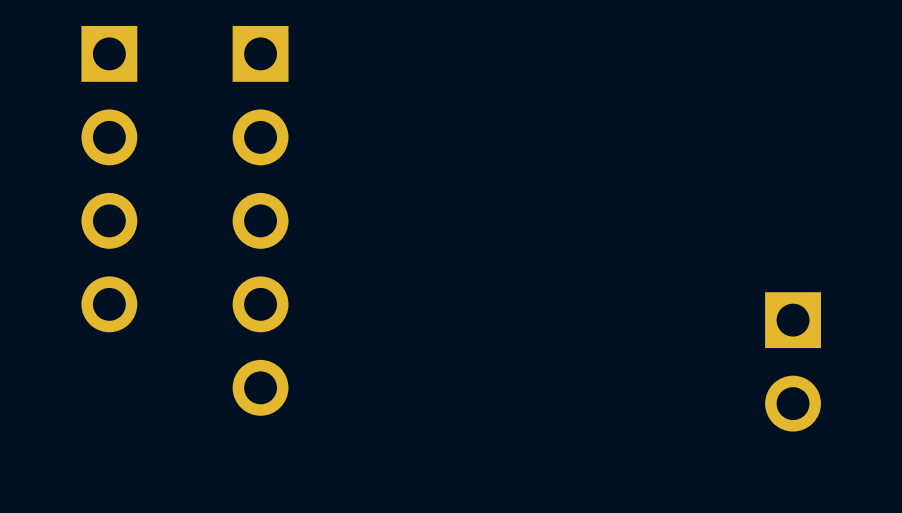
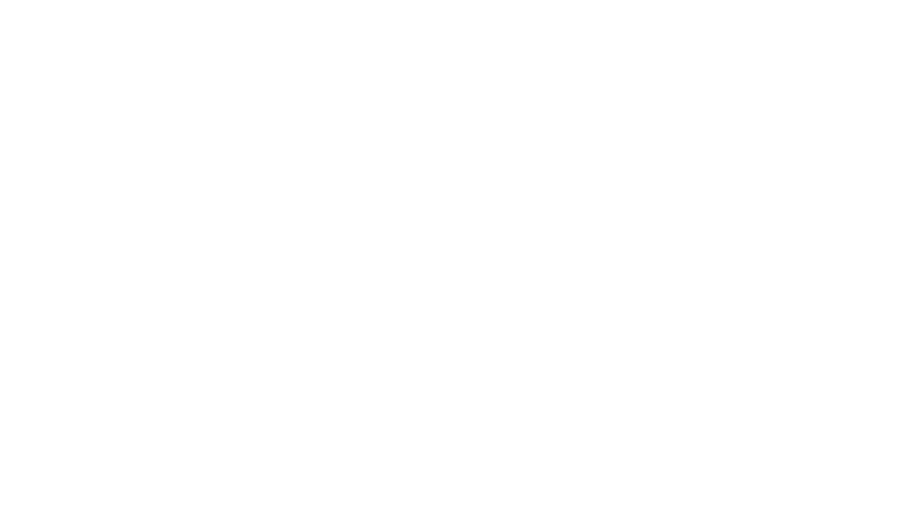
part: (109, 179) -> none
part: (260, 220) -> none
part: (793, 361) -> none

